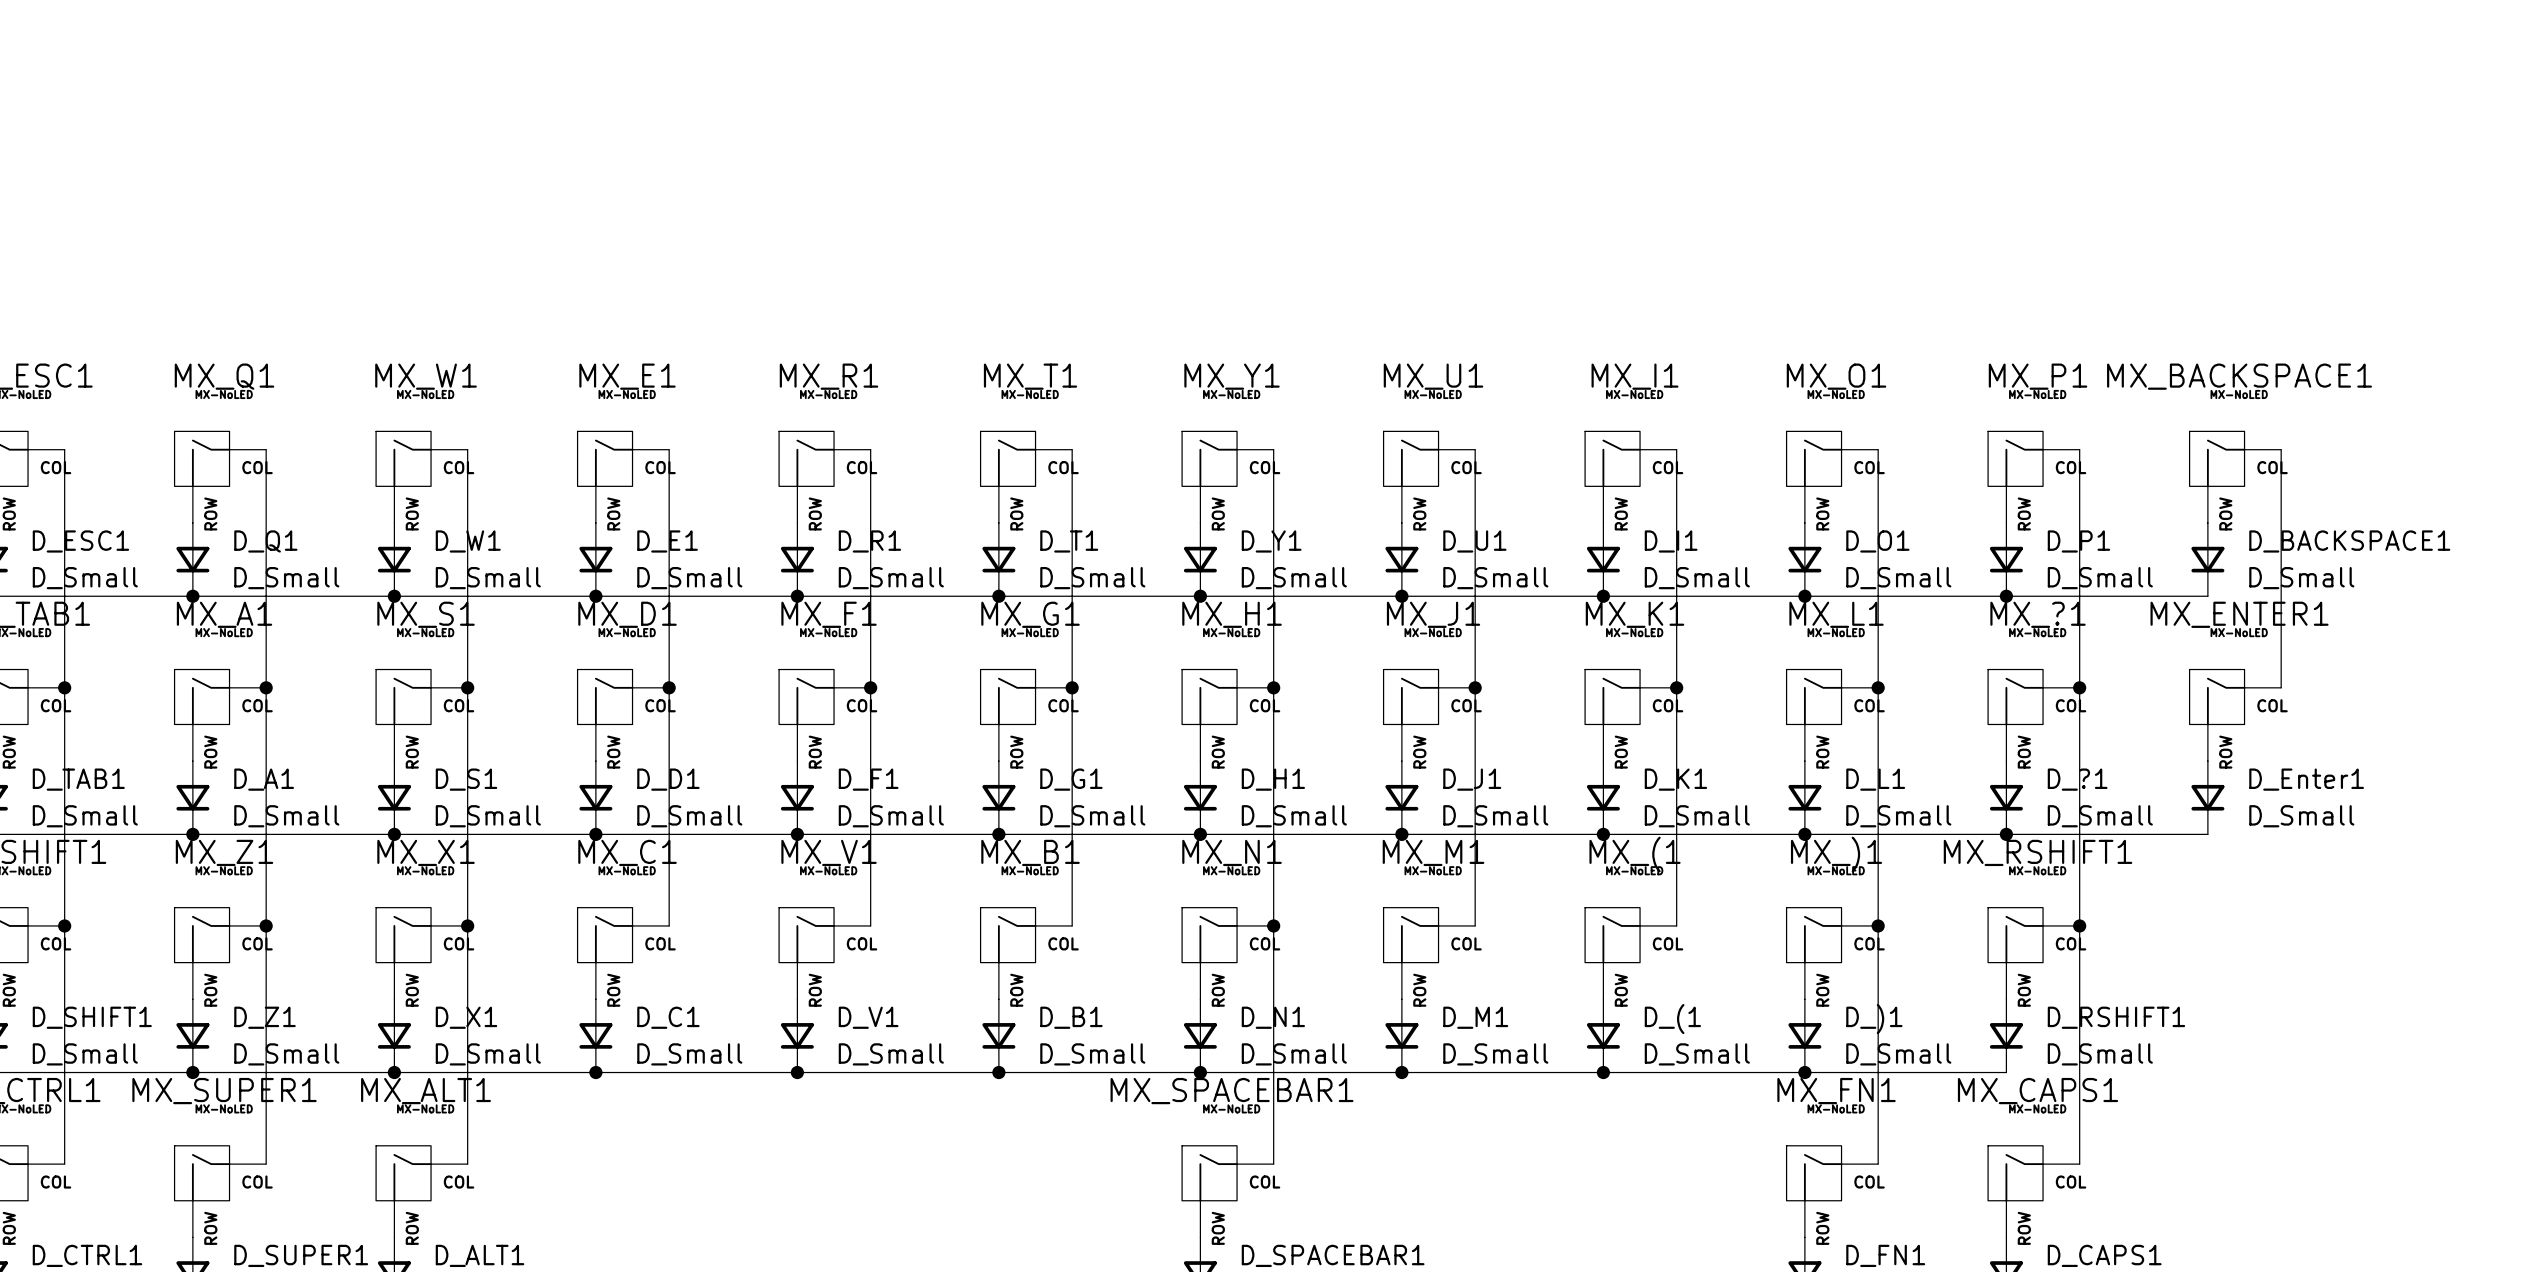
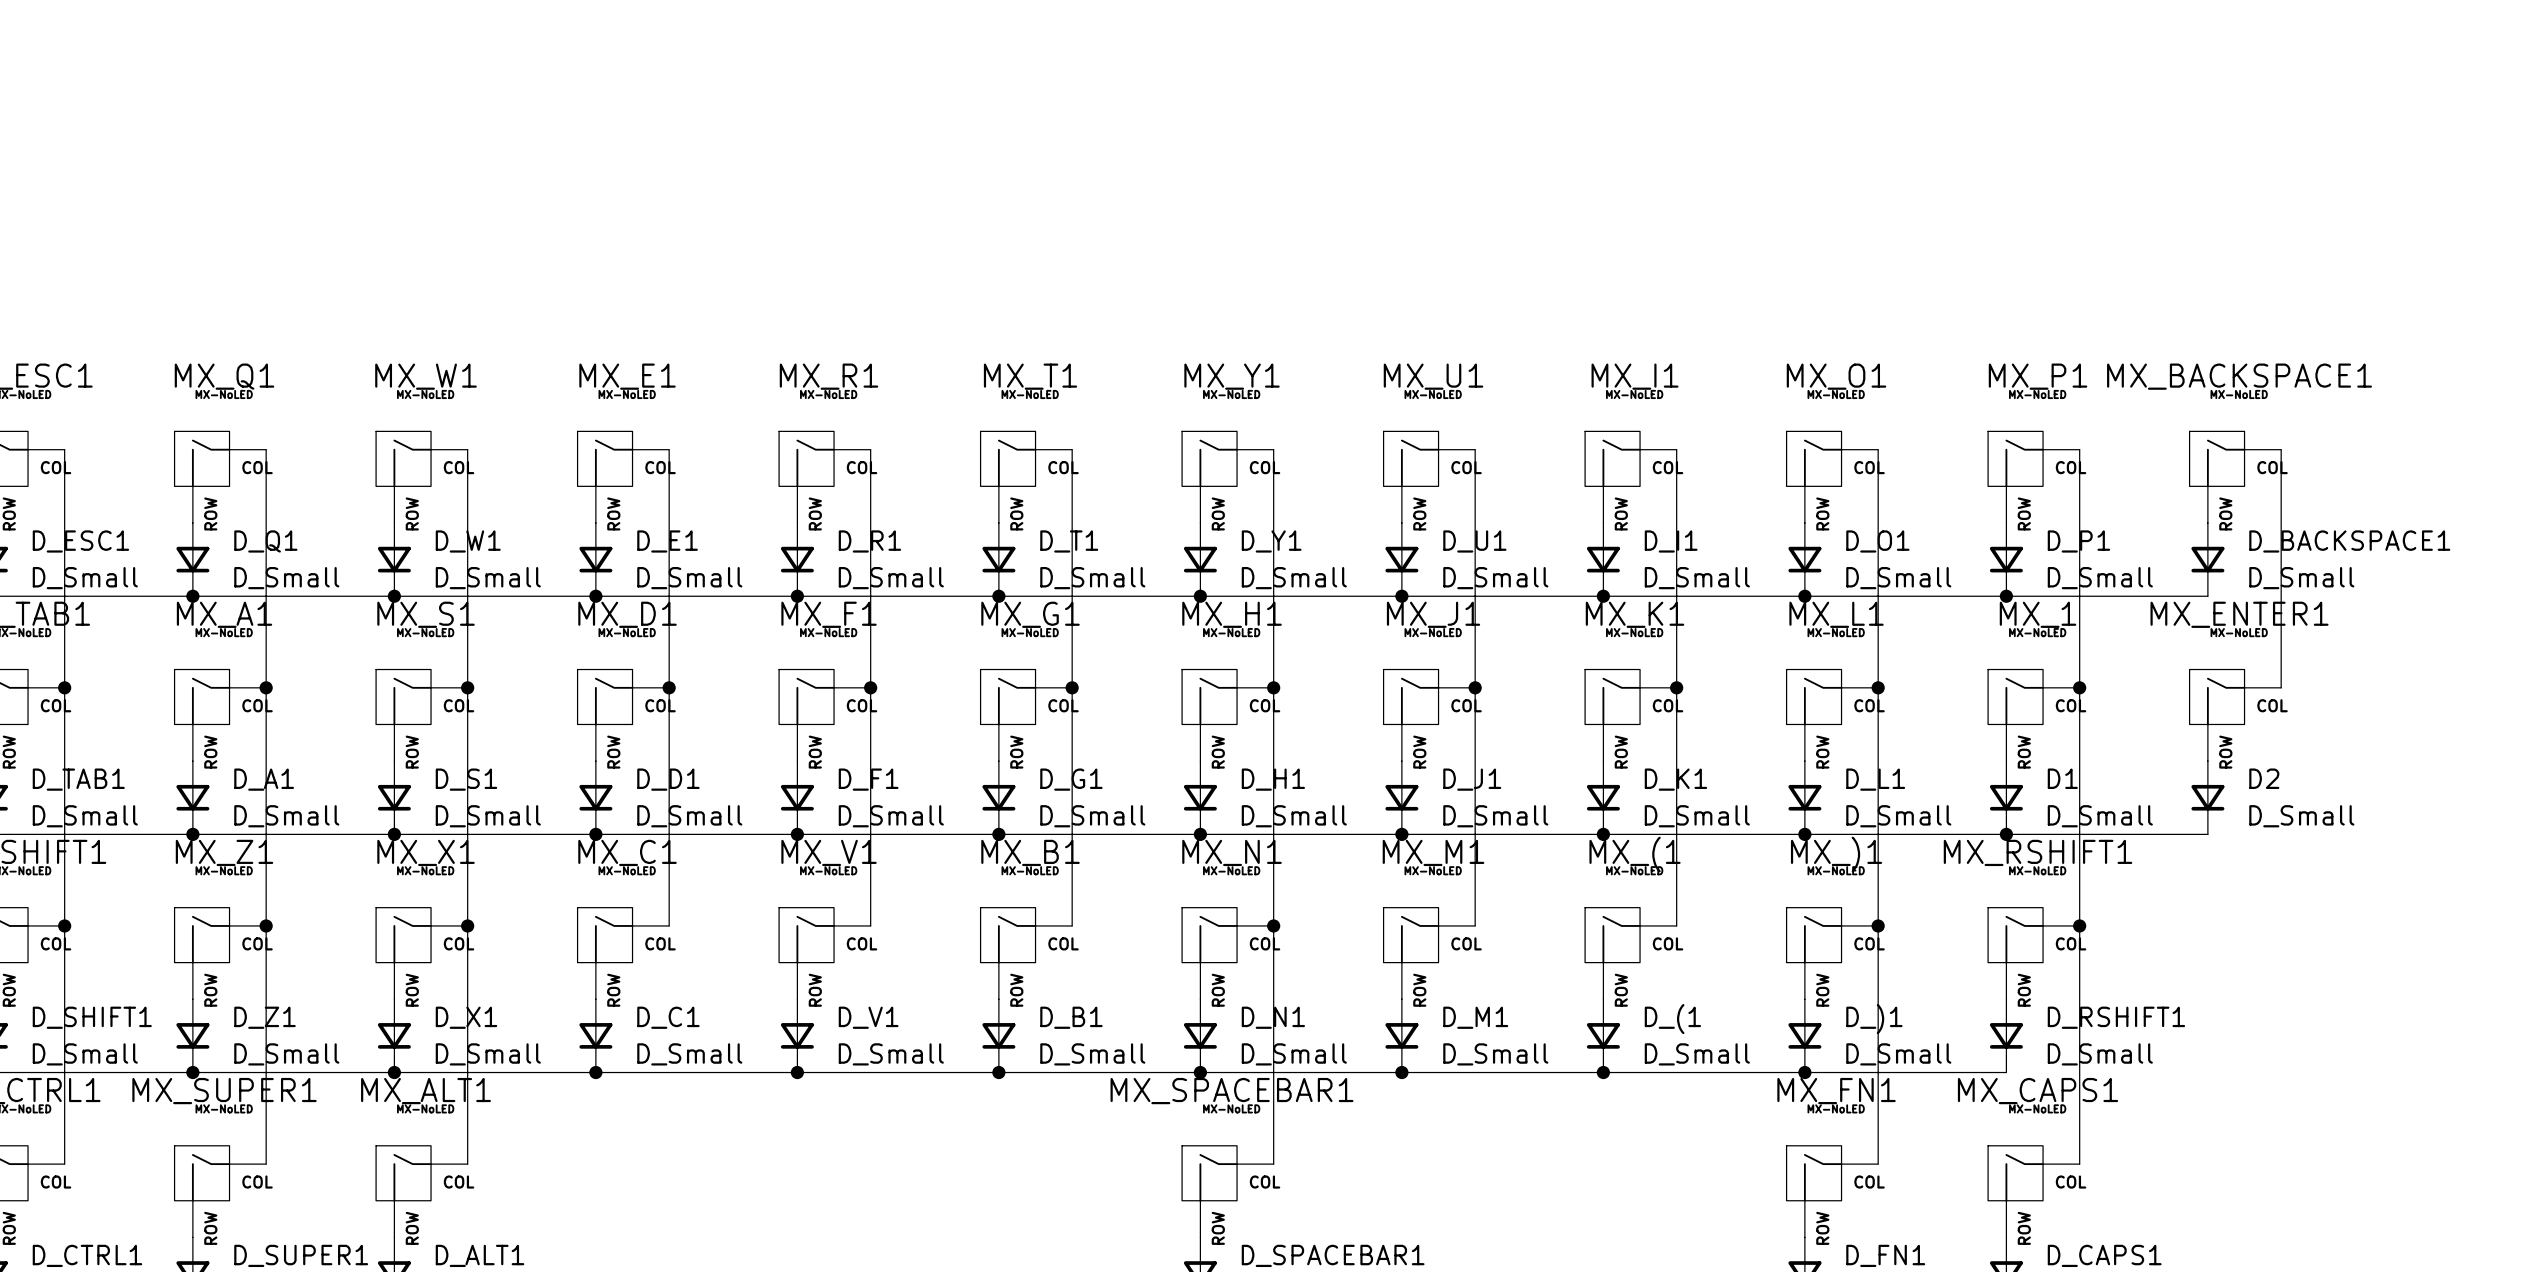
MX_?1 name: MX_?1 (2038, 614) -> MX_1 (2038, 614)
D_?1 name: D_?1 (2077, 779) -> D1 (2062, 778)
D_Enter1 name: D_Enter1 (2306, 779) -> D2 (2264, 778)

